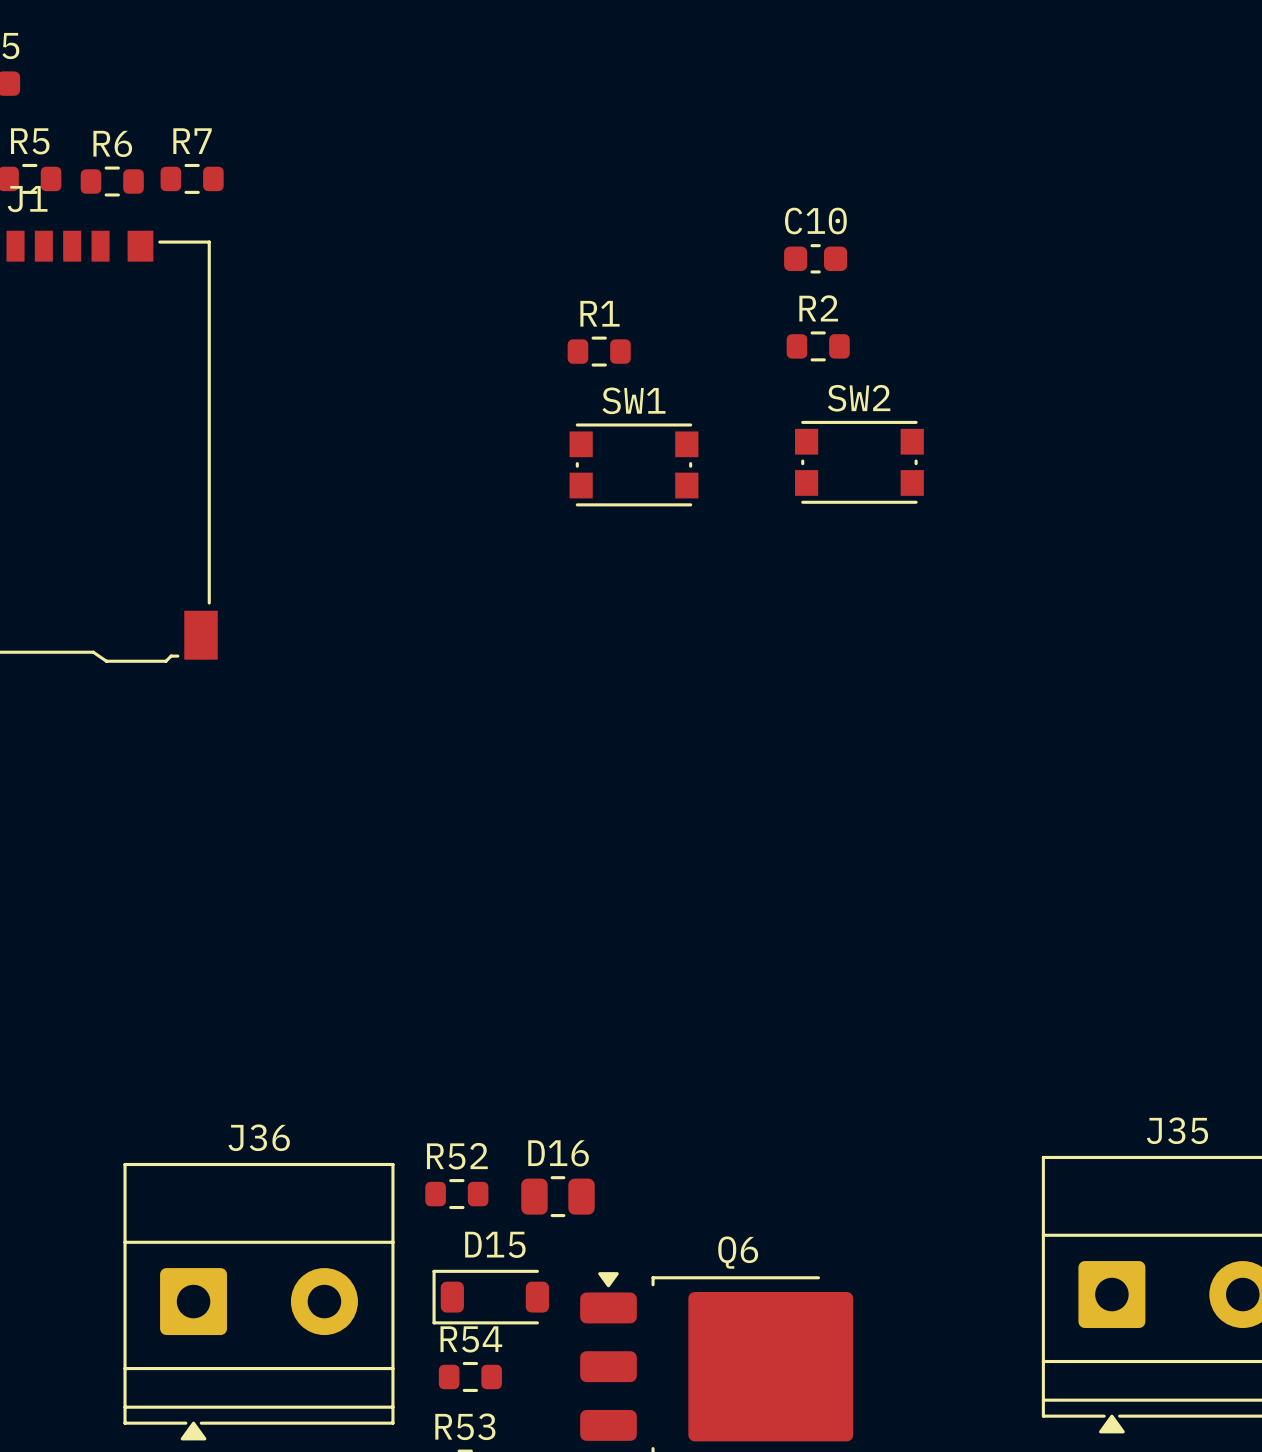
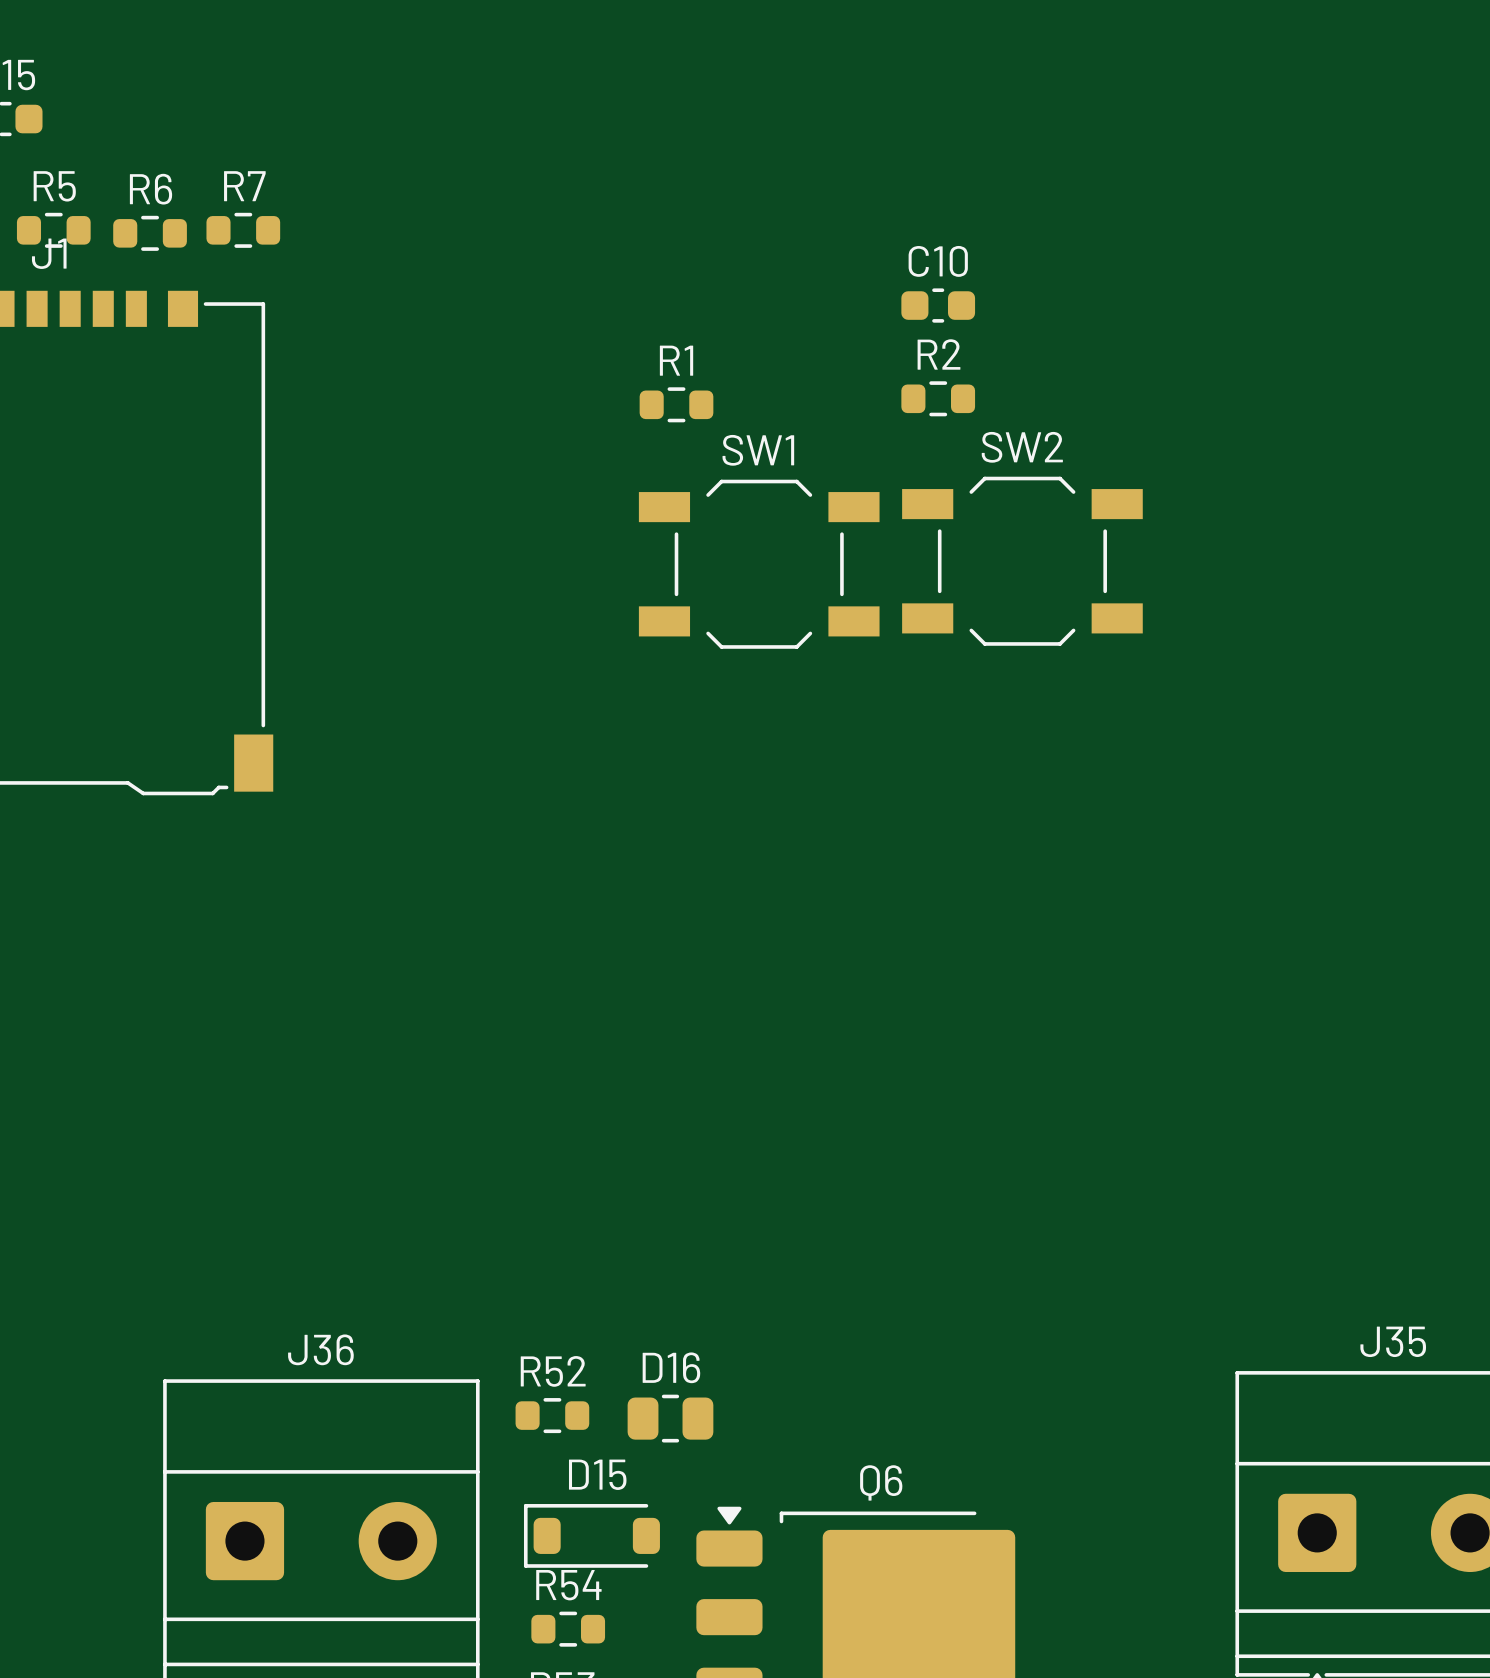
C10 position: (815, 258) -> (938, 305)
R2 position: (818, 346) -> (938, 398)
R1 position: (599, 351) -> (676, 404)
SW2 footprint: [795, 420, 924, 504] -> [902, 476, 1143, 646]
SW1 footprint: [569, 423, 699, 507] -> [638, 479, 880, 649]

